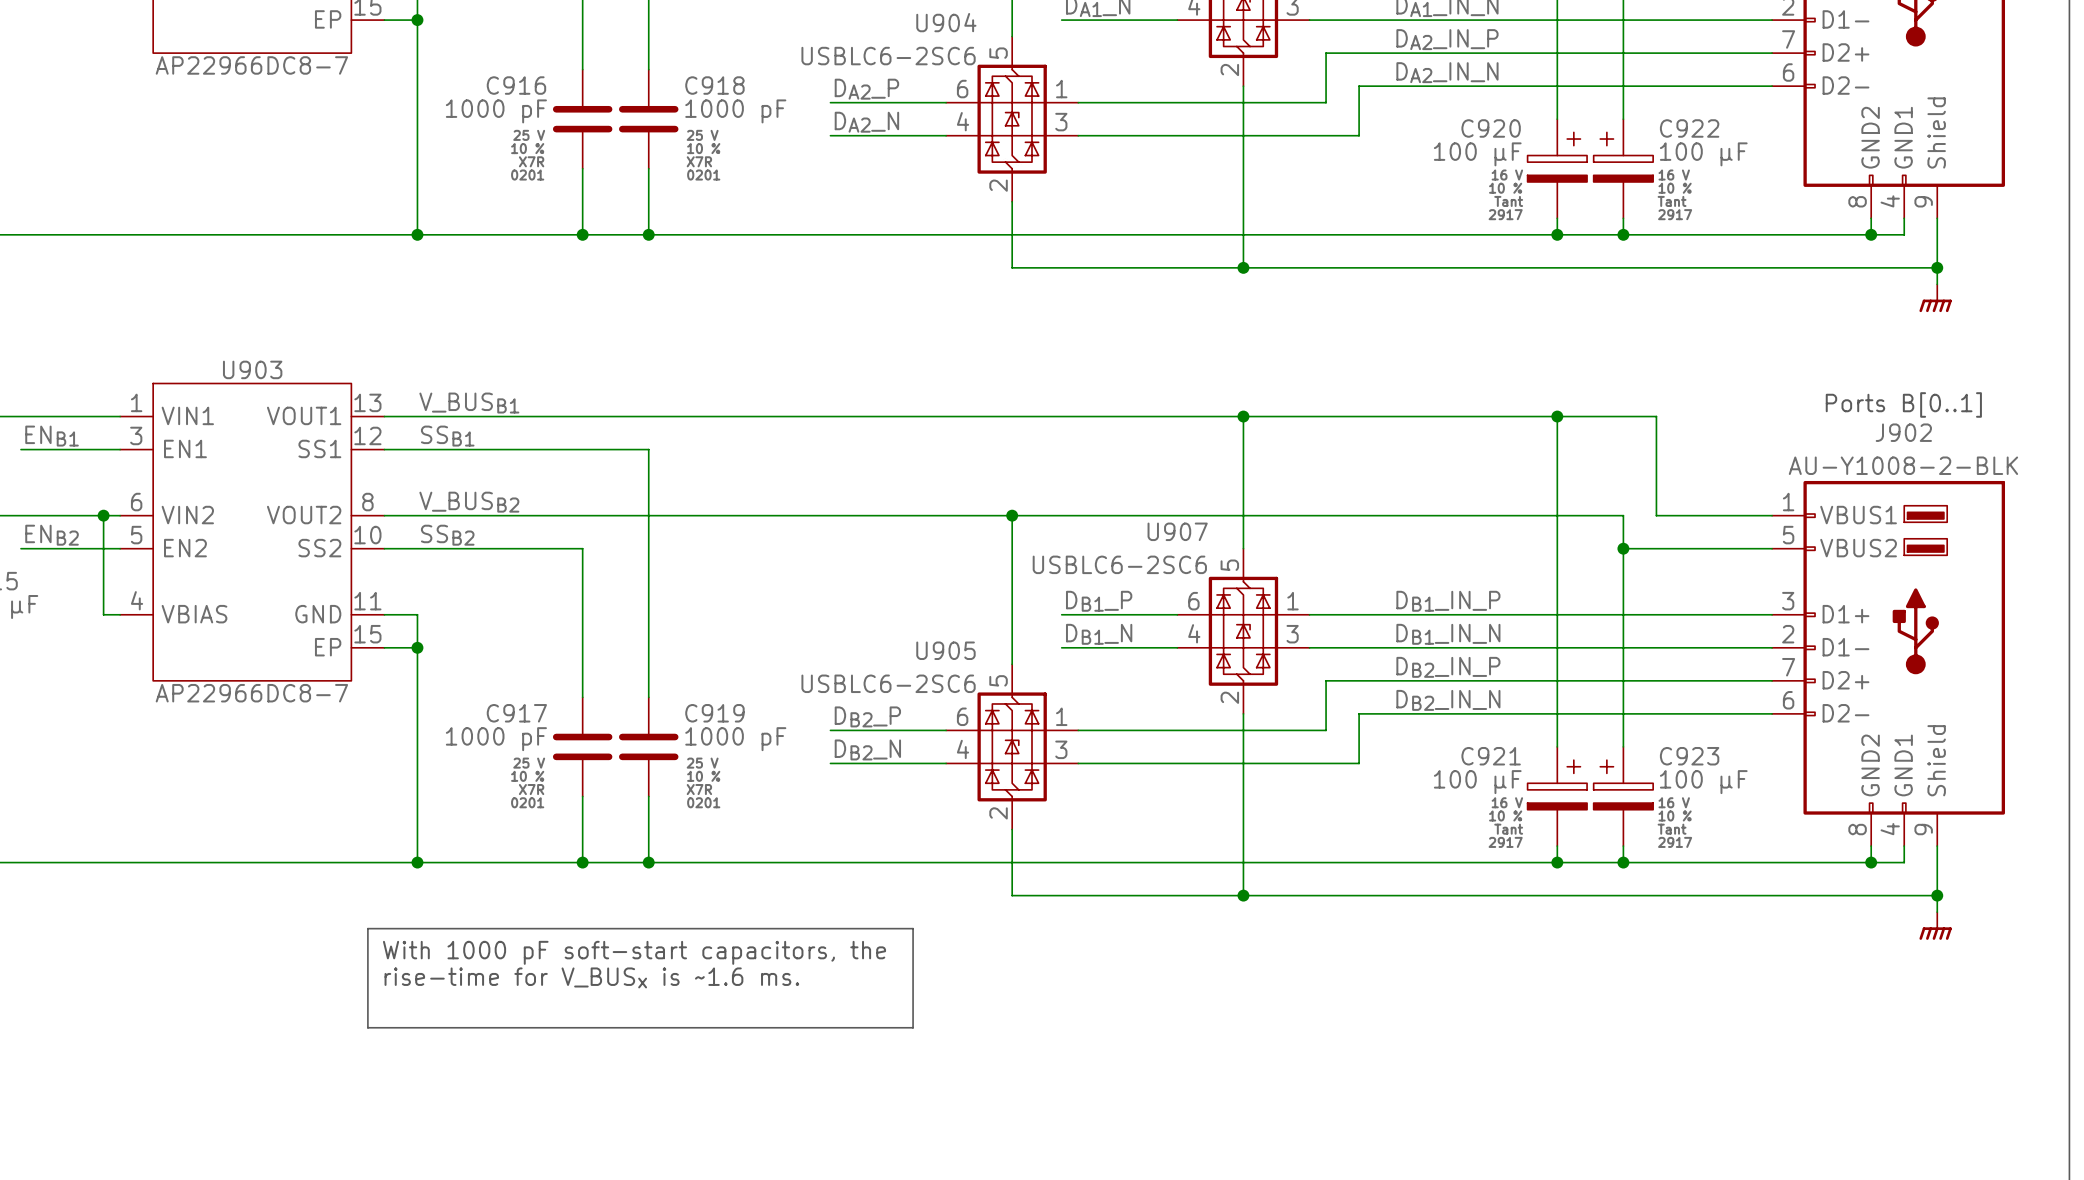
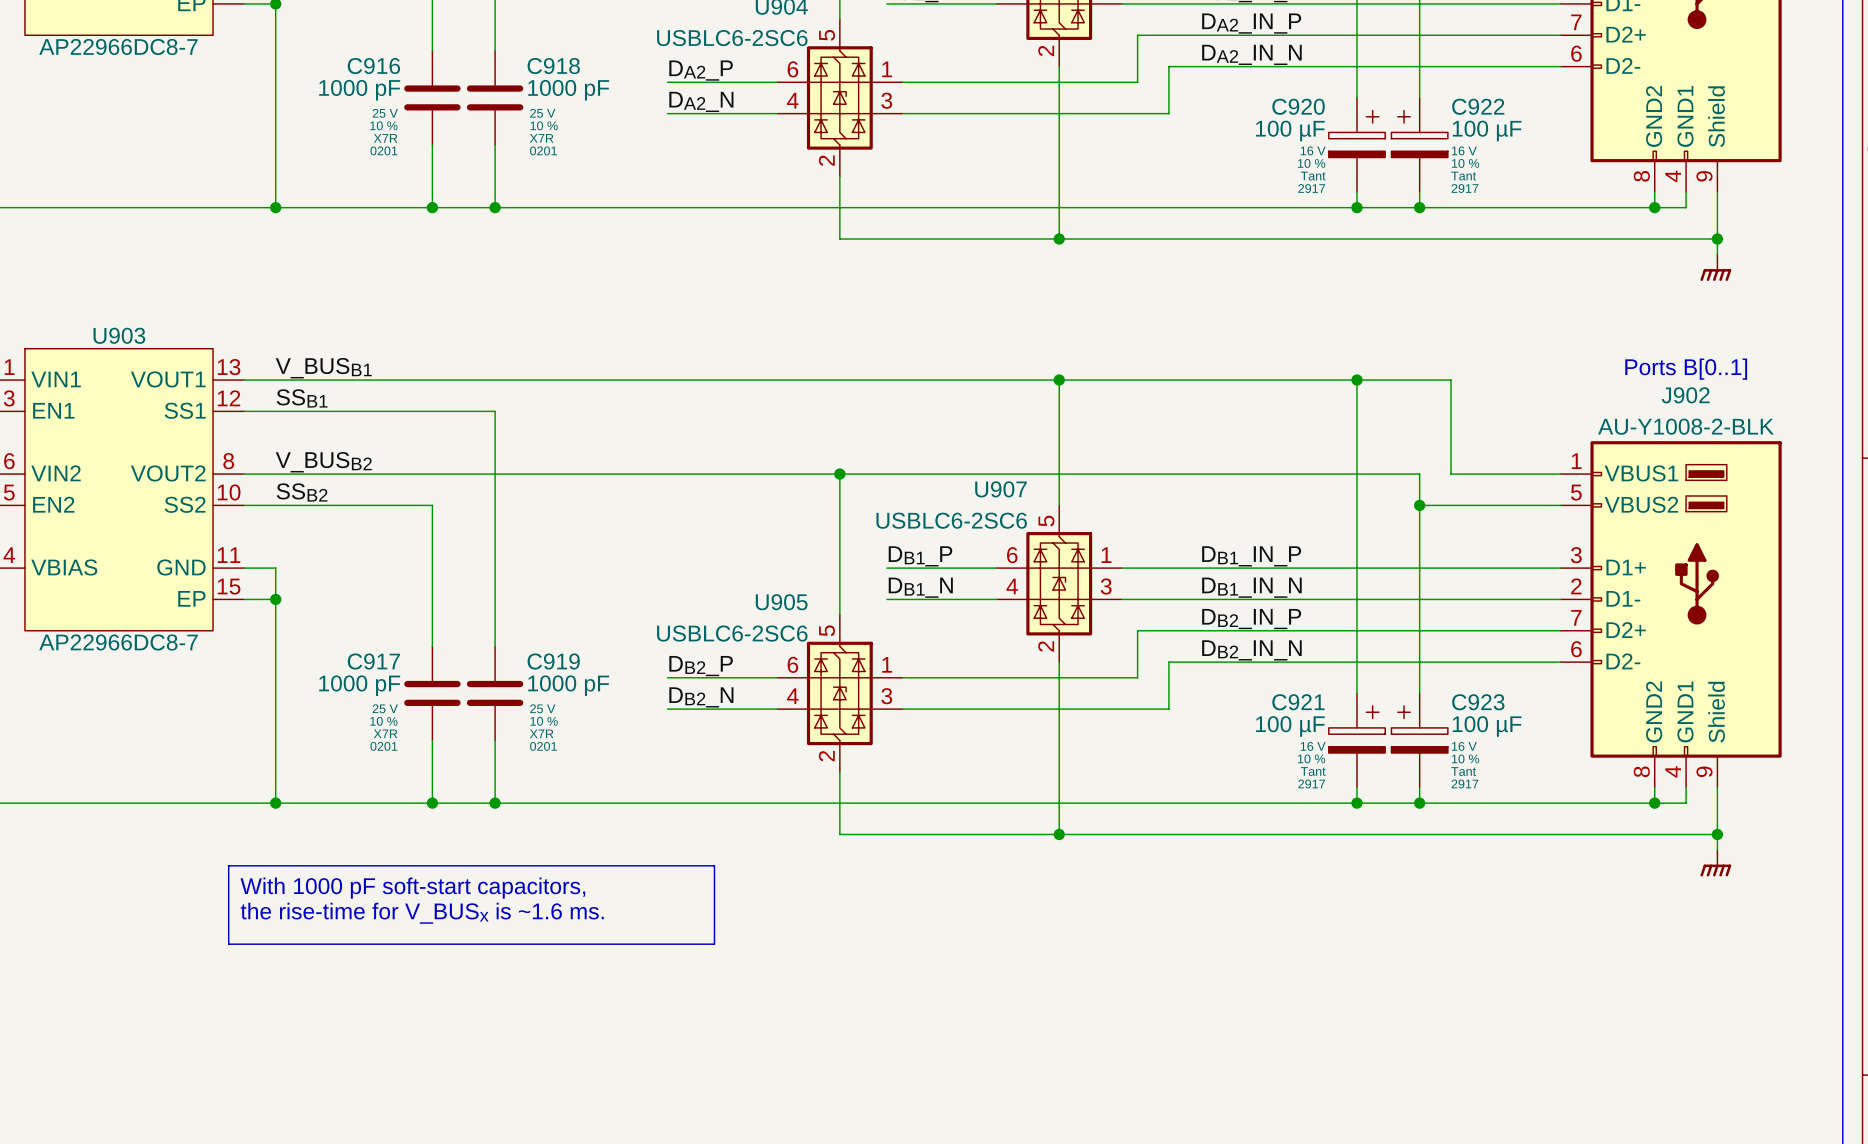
line: (880, 928) (913, 928) (913, 1027) (367, 1027) (367, 1011) -> (714, 865) (714, 944) (228, 944)
text: With 1000 pF soft-start capacitors, the (634, 952) -> With 1000 pF soft-start capacitors, (412, 888)
text: rise-time for V_BUSx is ~1.6 ms. (591, 977) -> the rise-time for V_BUSx is ~1.6 ms. (422, 913)

